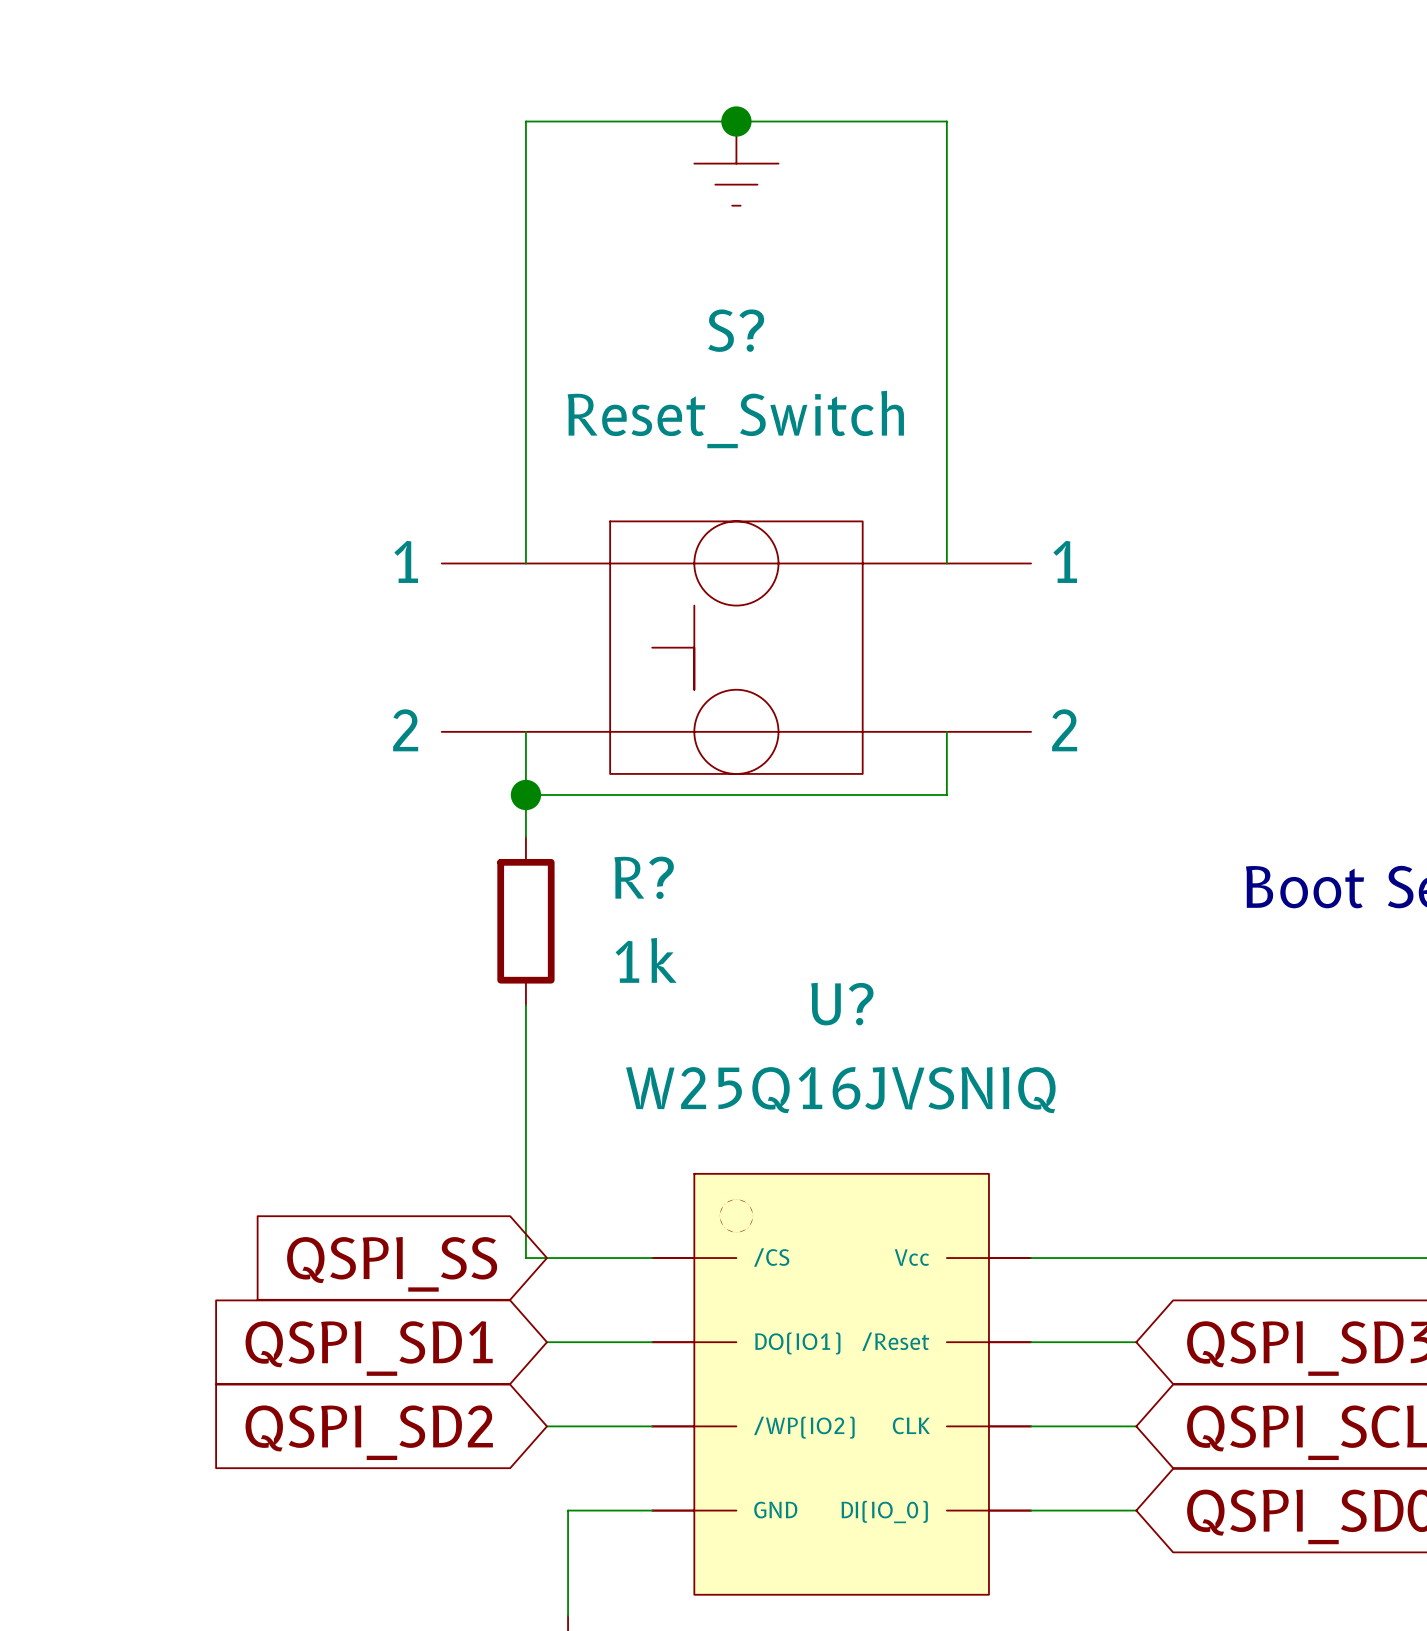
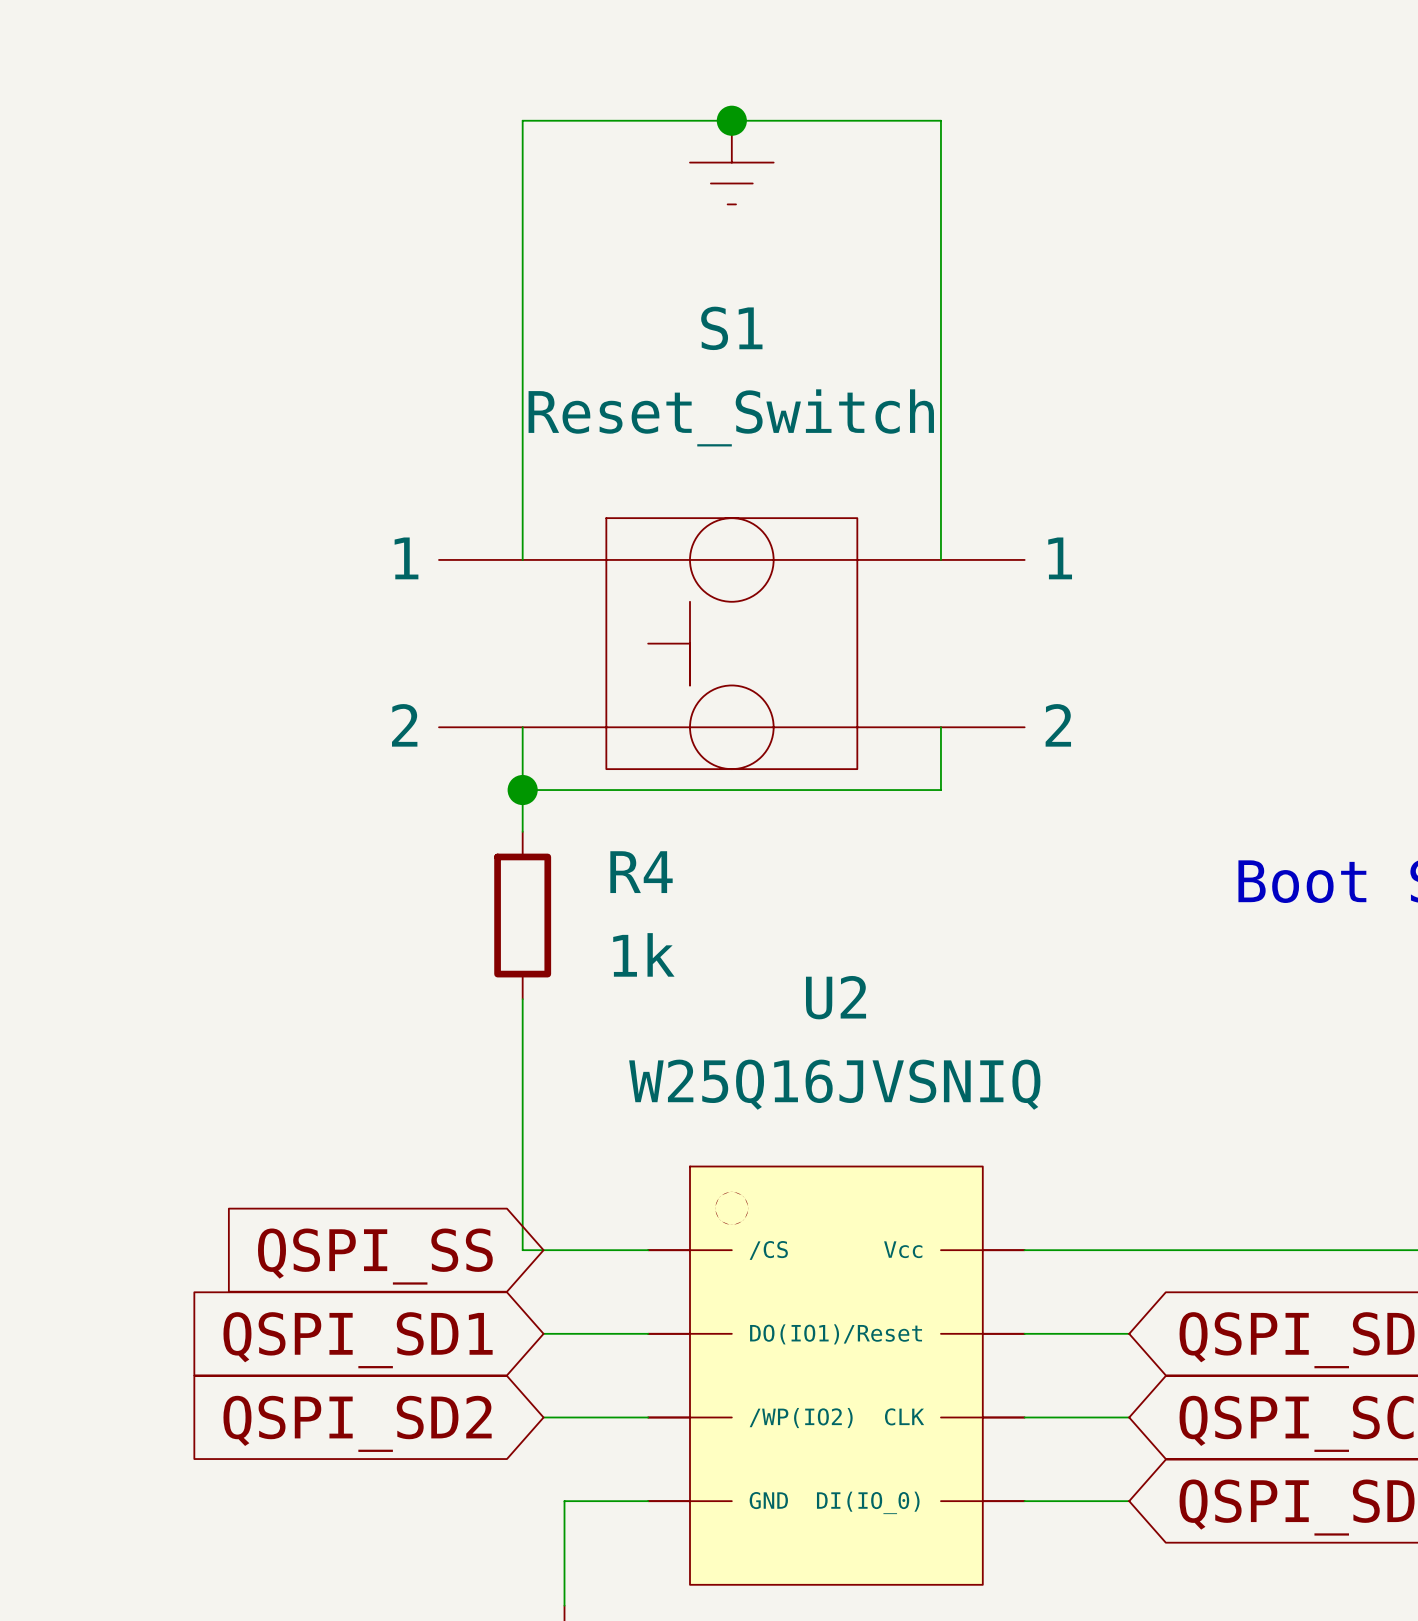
S? name: S? (736, 330) -> S1 (731, 328)
R? name: R? (644, 877) -> R4 (641, 872)
U? name: U? (842, 1004) -> U2 (836, 997)

